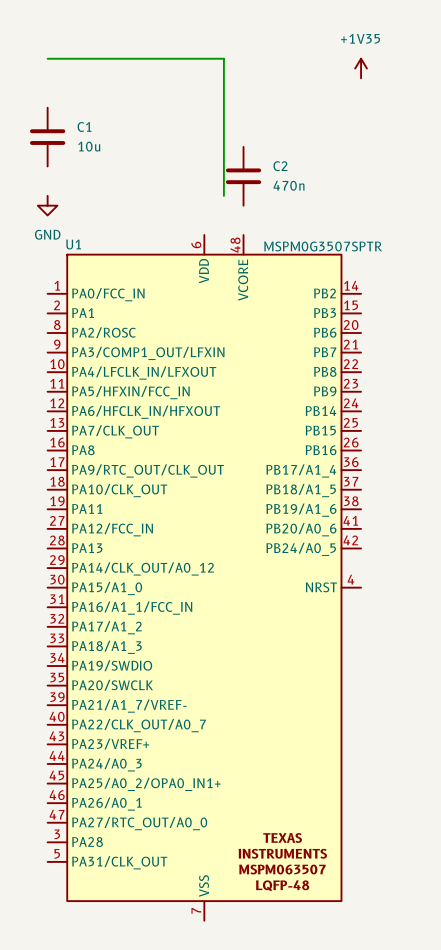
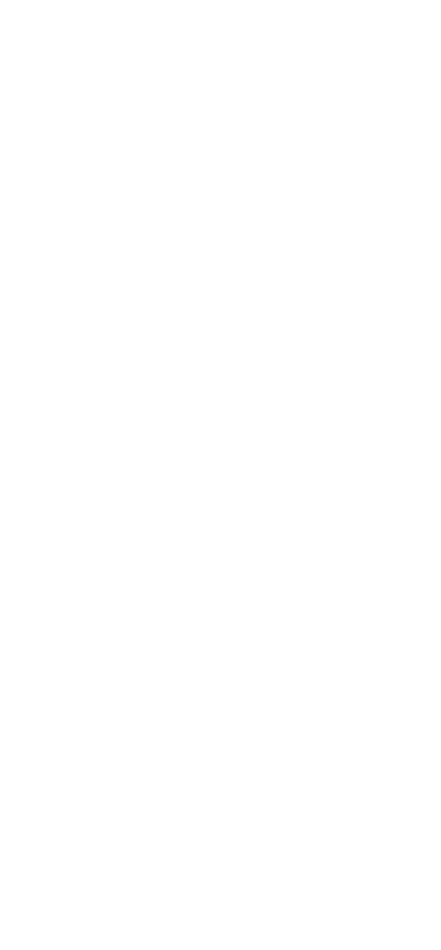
wire: (47, 58) (223, 58) (223, 195) -> none
power symbol: +1V35 (361, 68) -> none
C1: 10u (47, 137) -> none
C2: 470n (243, 176) -> none
power symbol: GND (47, 205) -> none
U1: MSPM0G3507SPTR (204, 577) -> none

